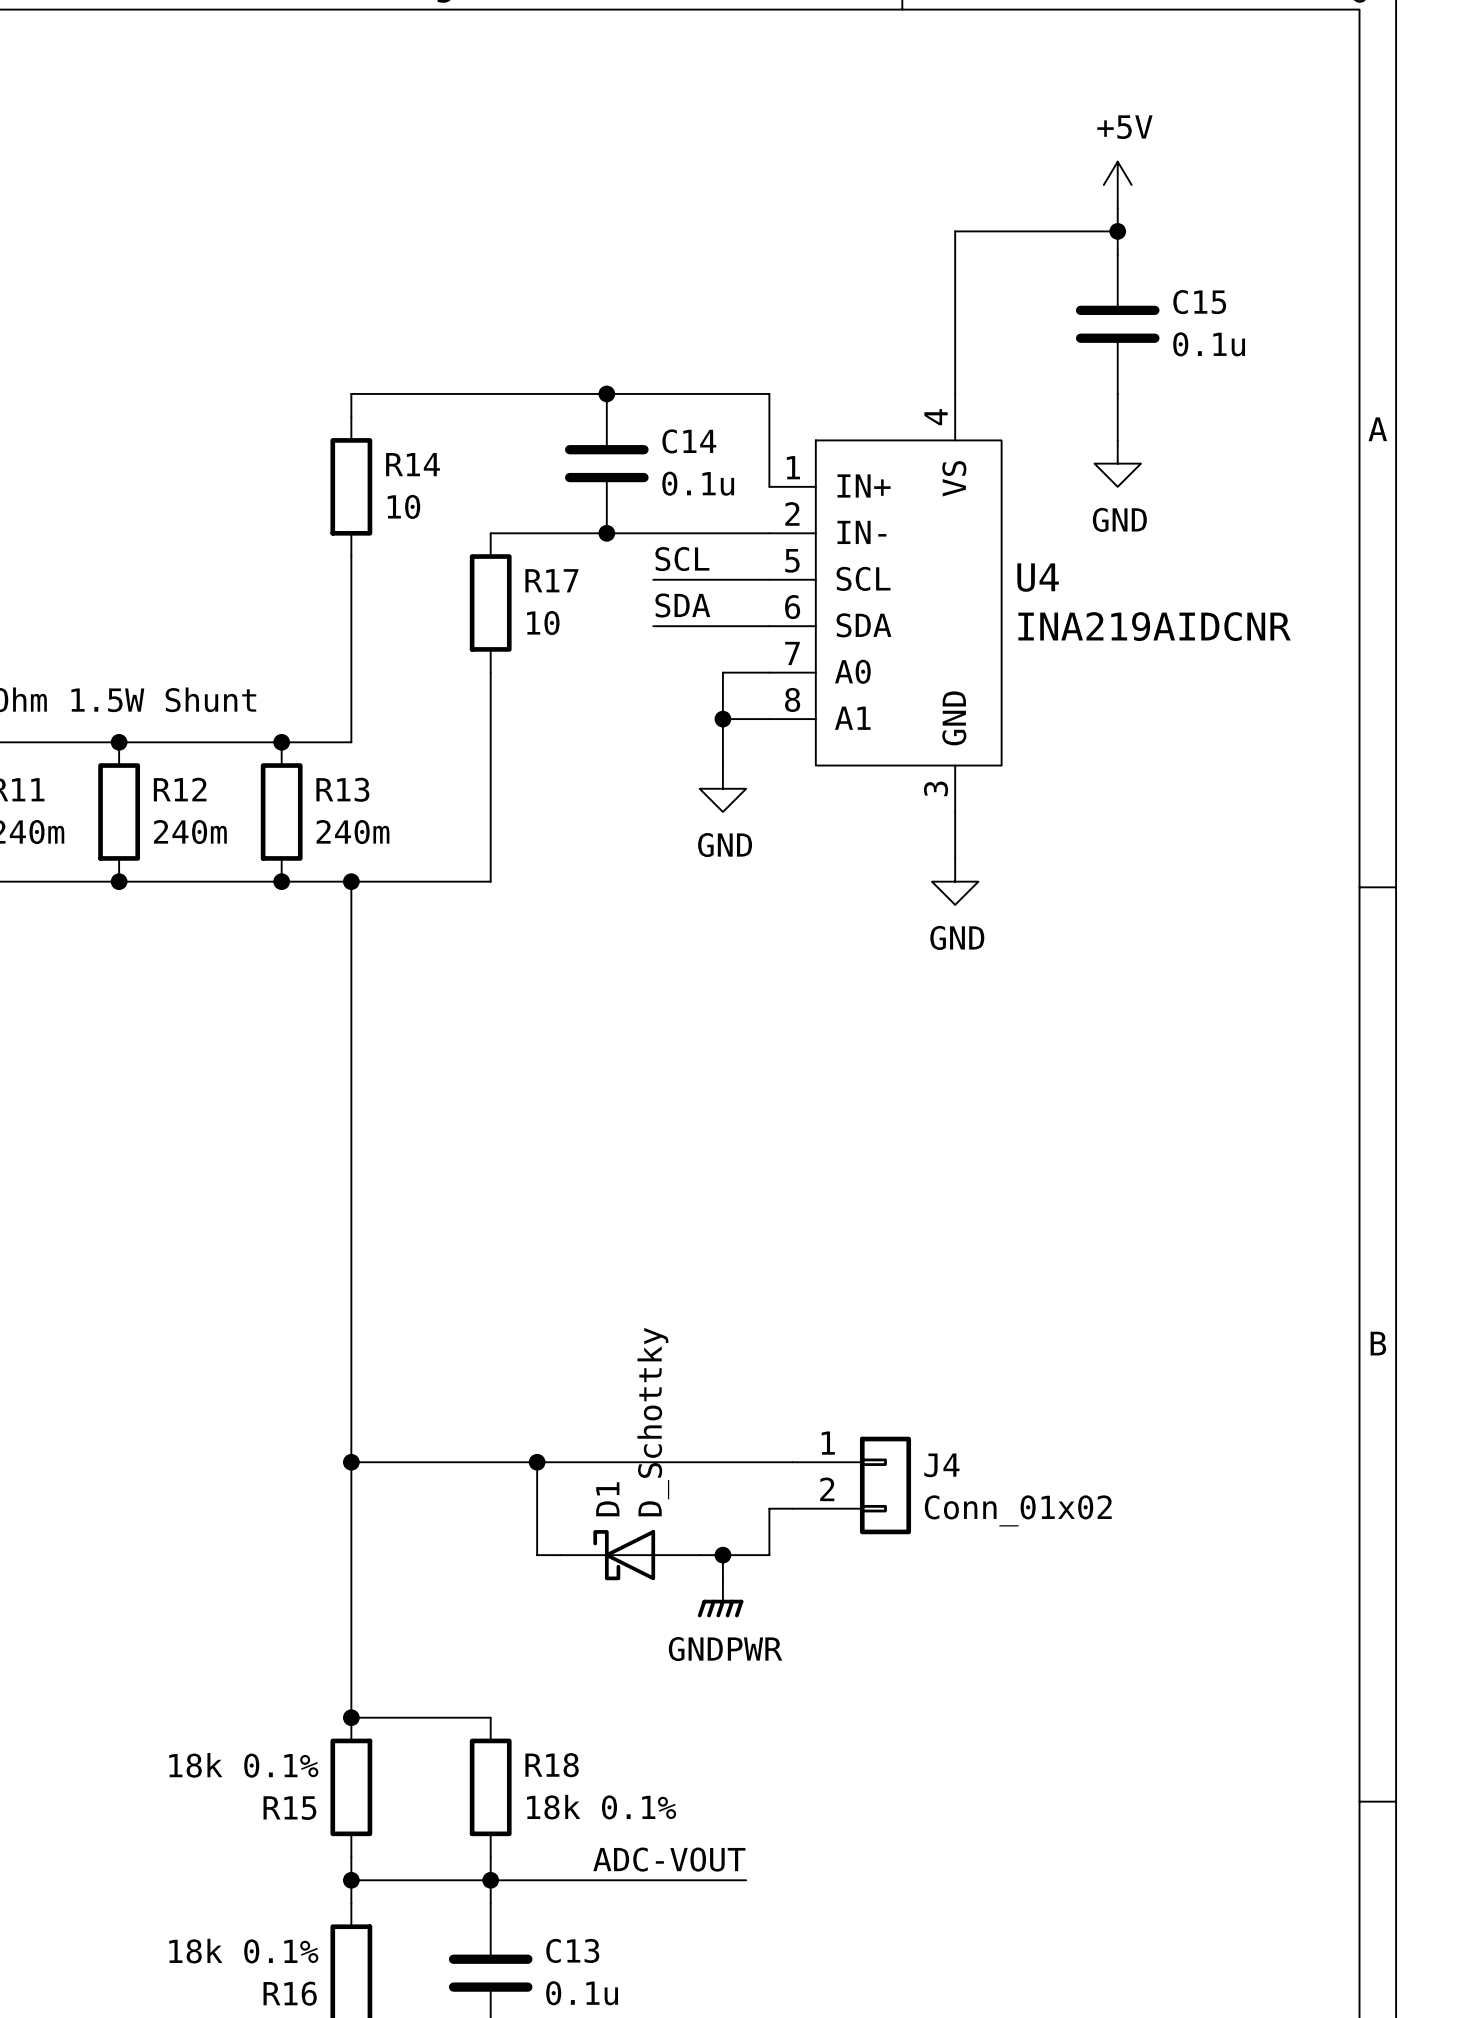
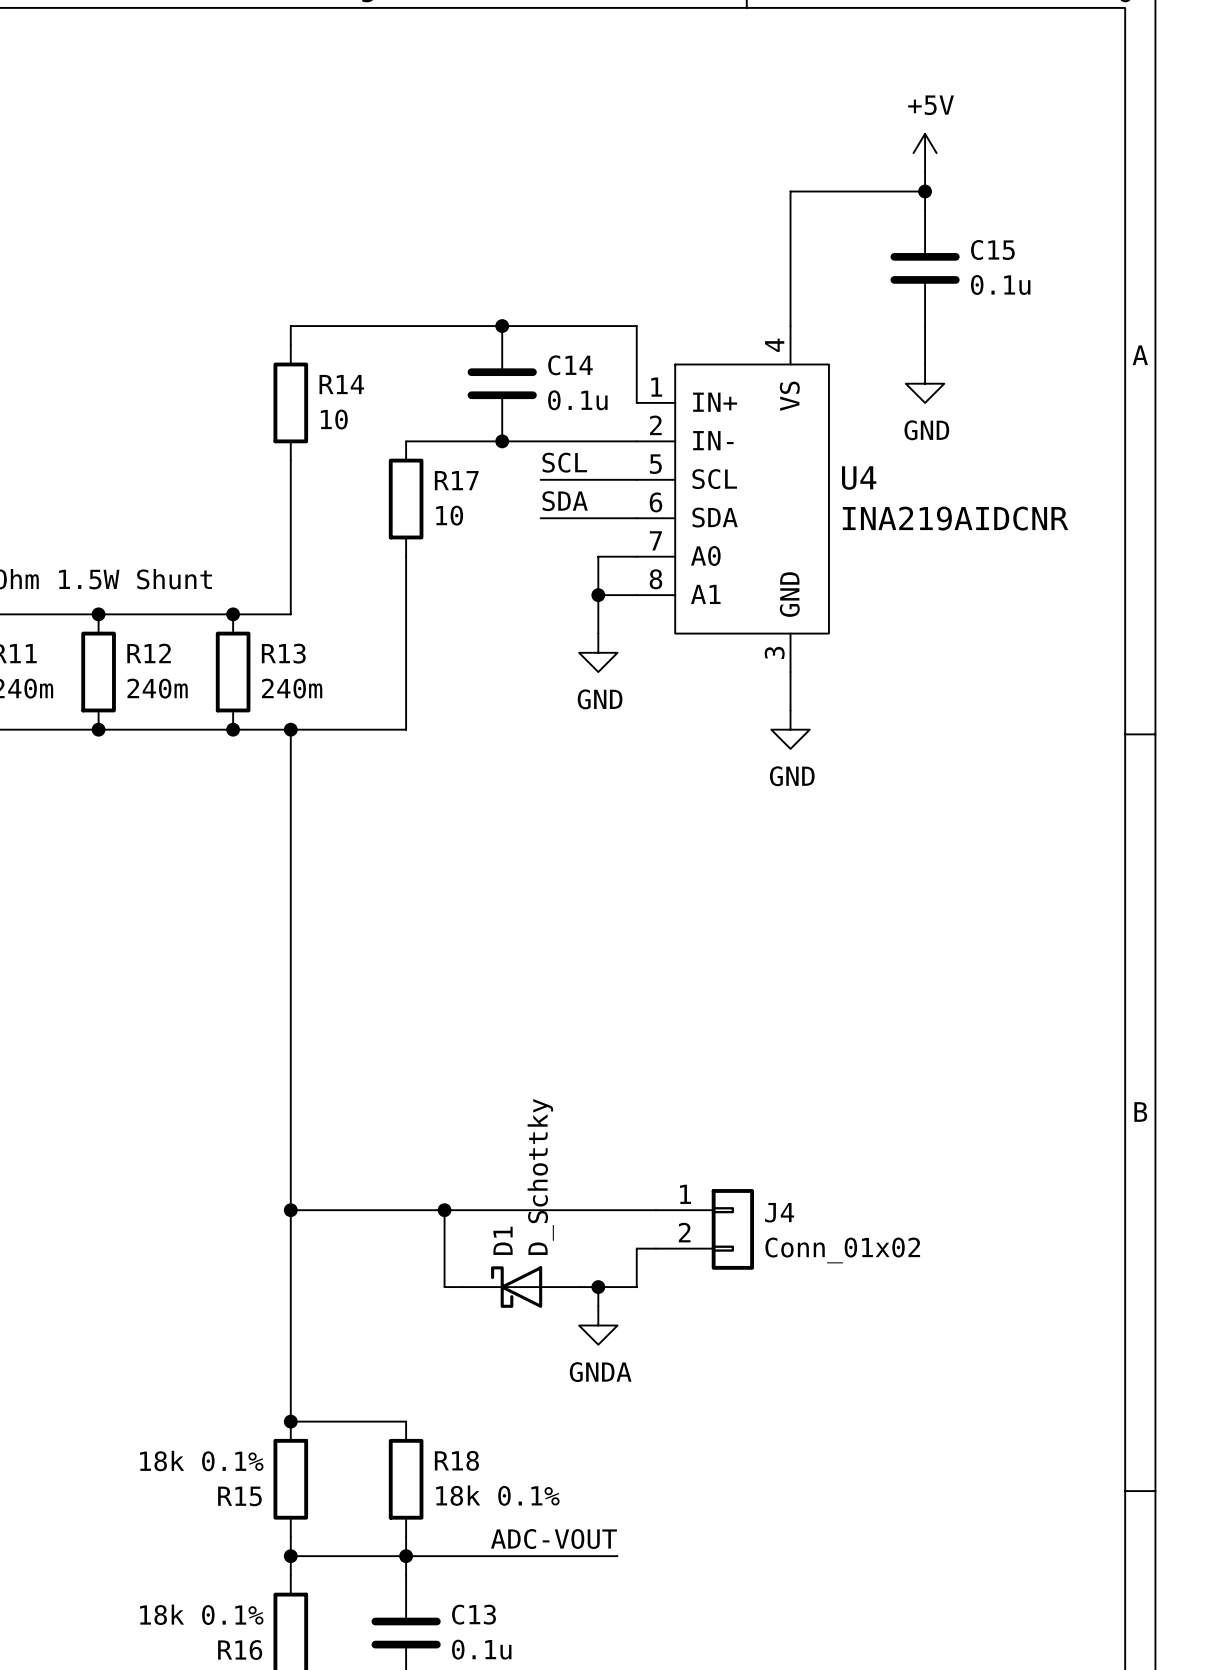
power symbol: GNDPWR (720, 1597) -> GNDA (598, 1325)

